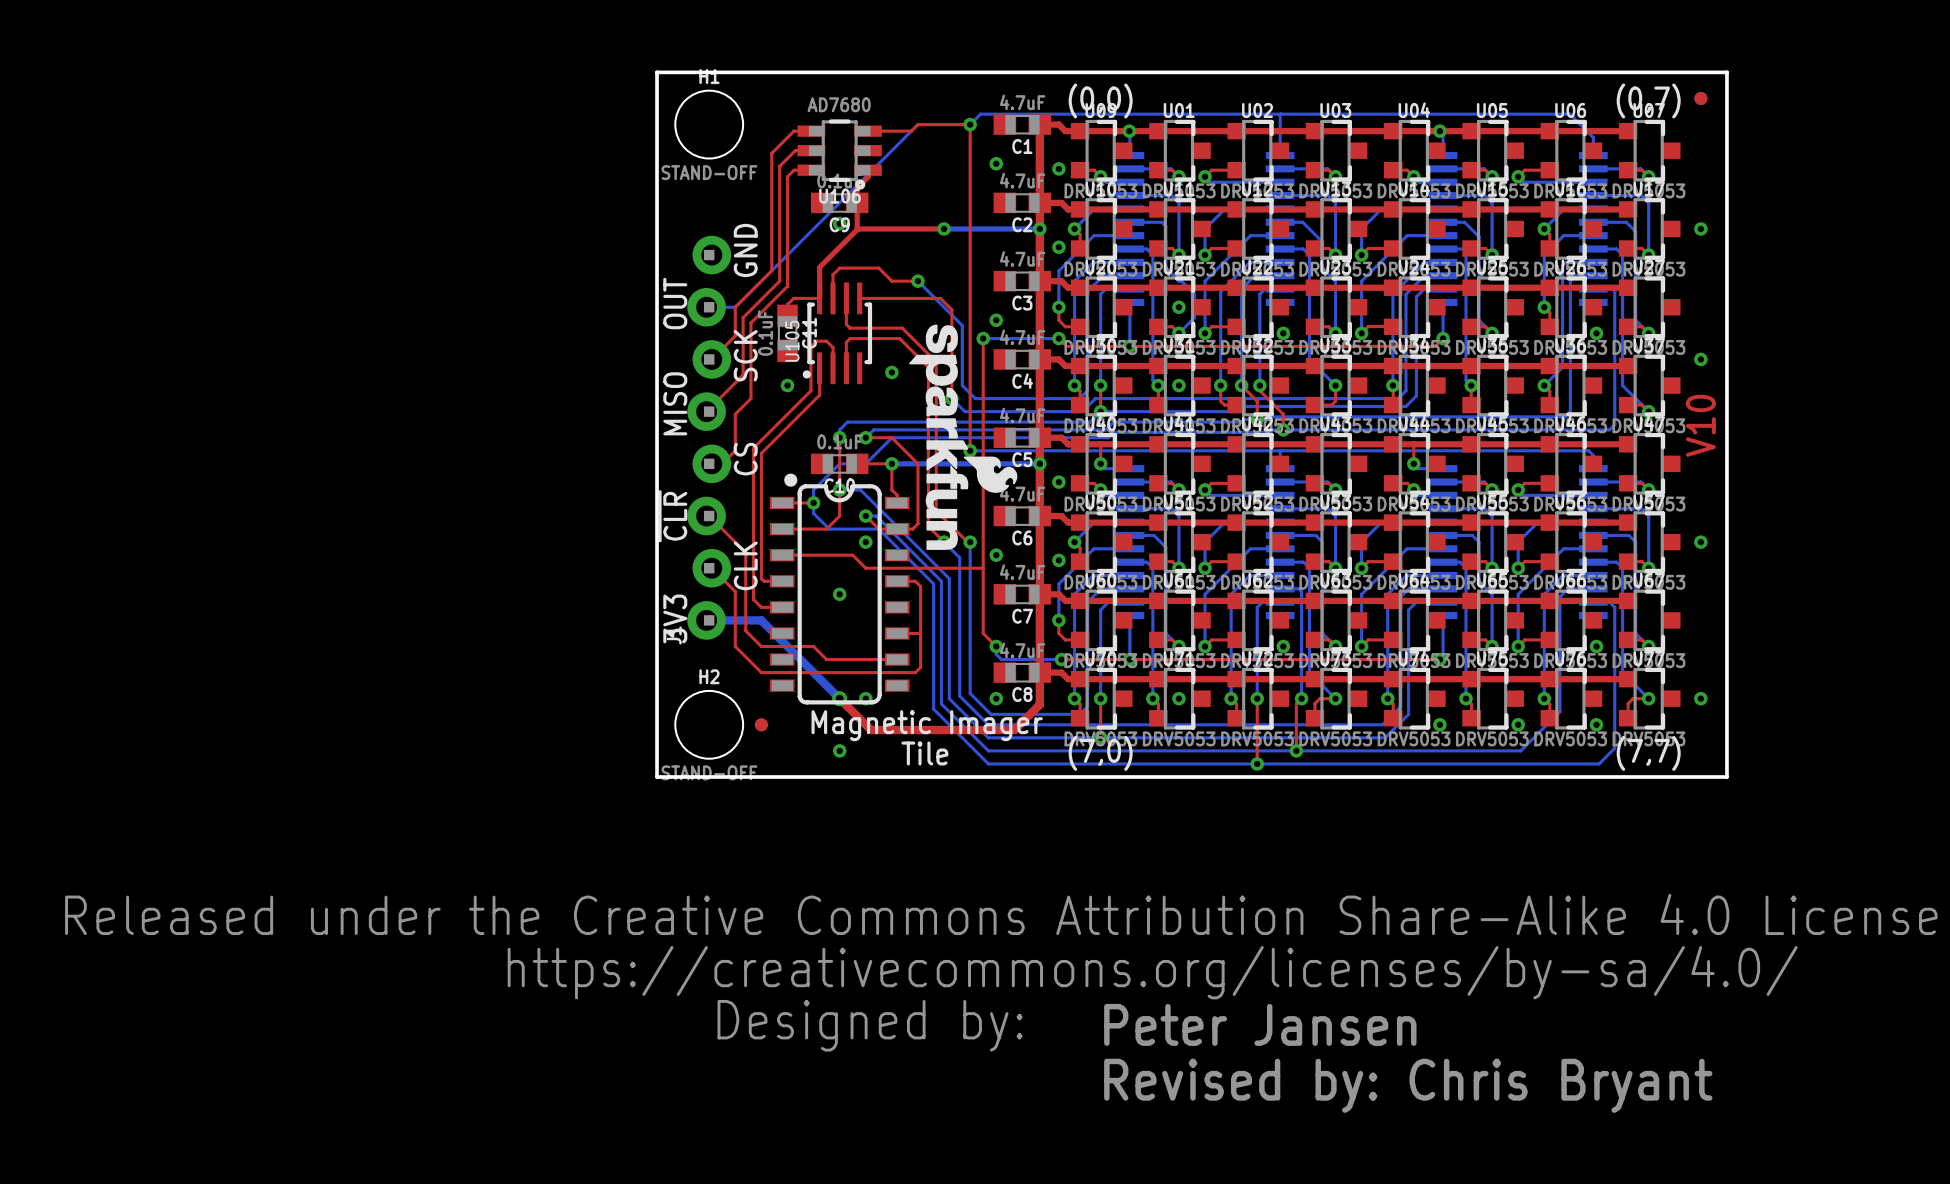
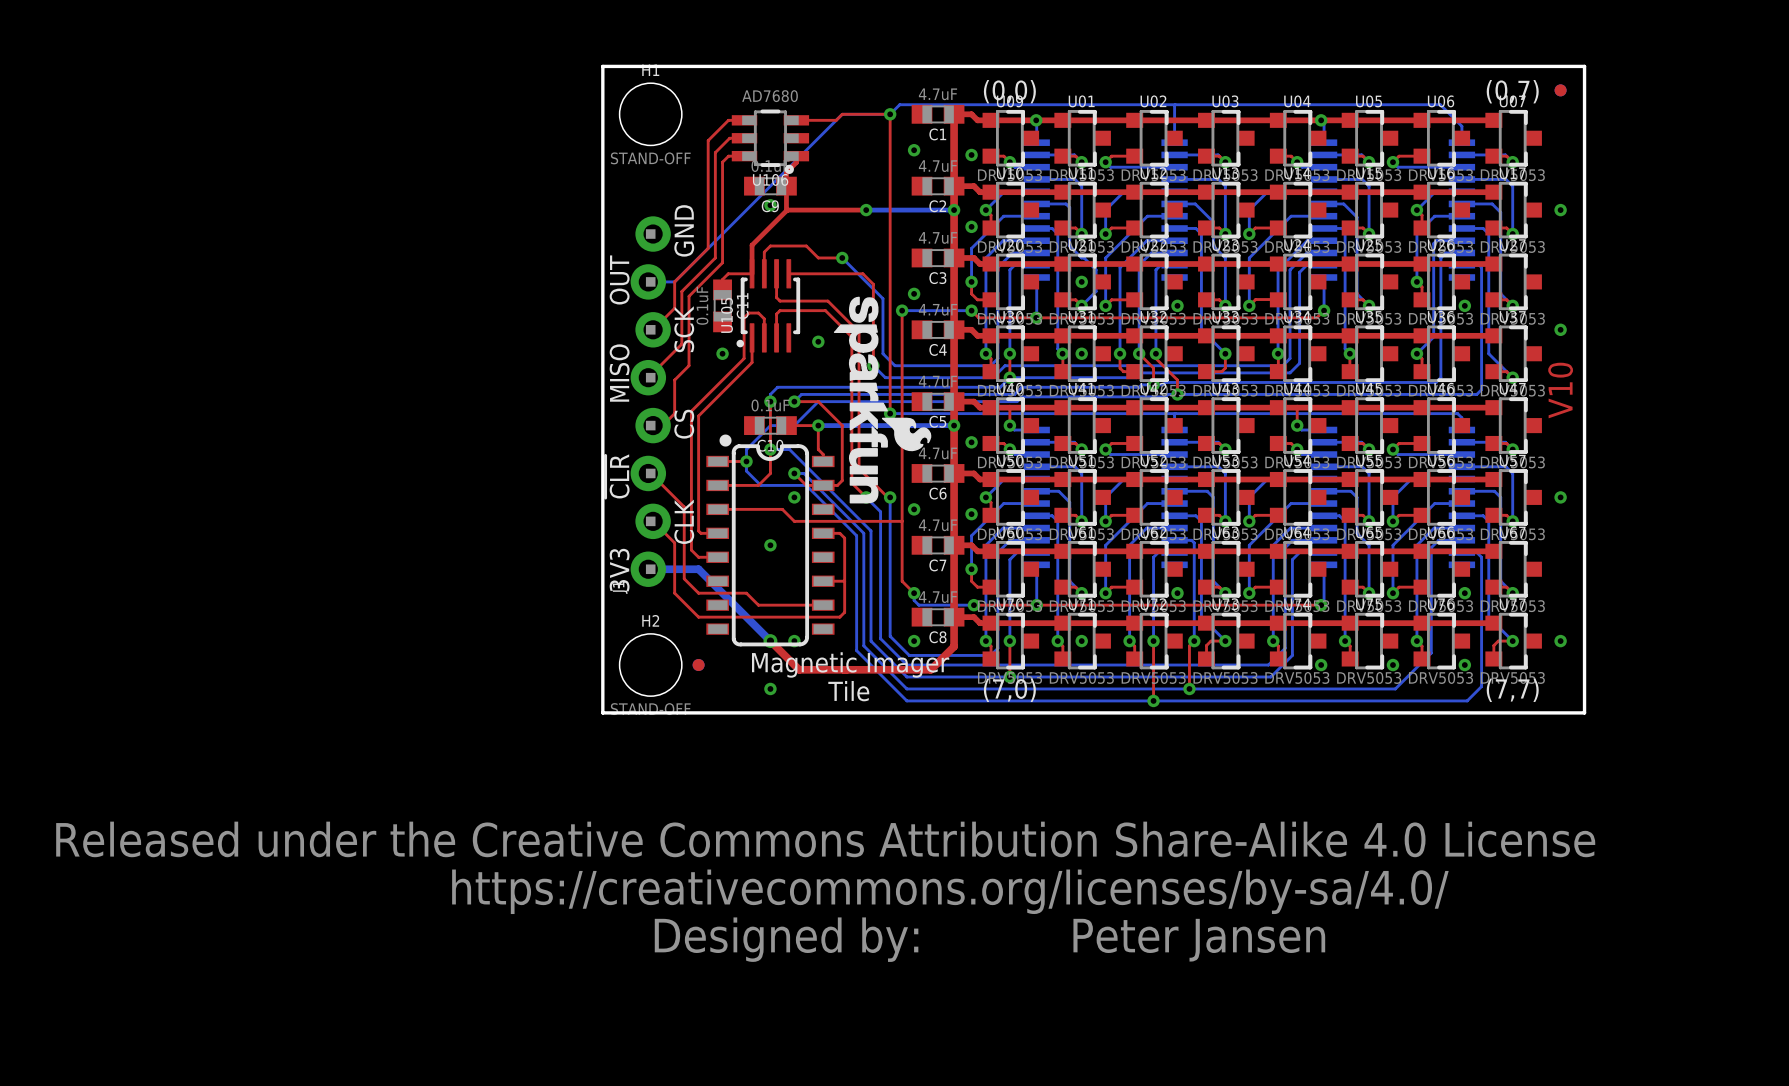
drawing: none -> [833, 296, 932, 504]
drawing: [909, 324, 1018, 550] -> none
text position: Peter Jansen (1260, 1024) -> Peter Jansen (1199, 940)
text: Revised by: Chris Bryant (1408, 1085) -> none

